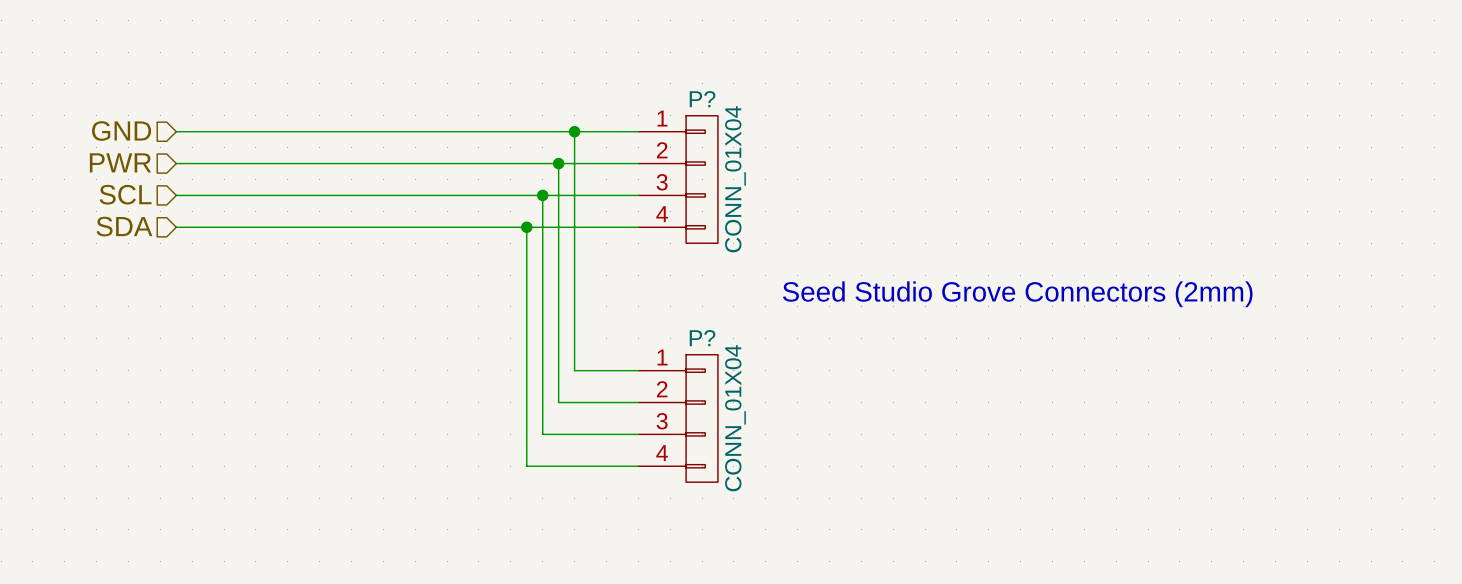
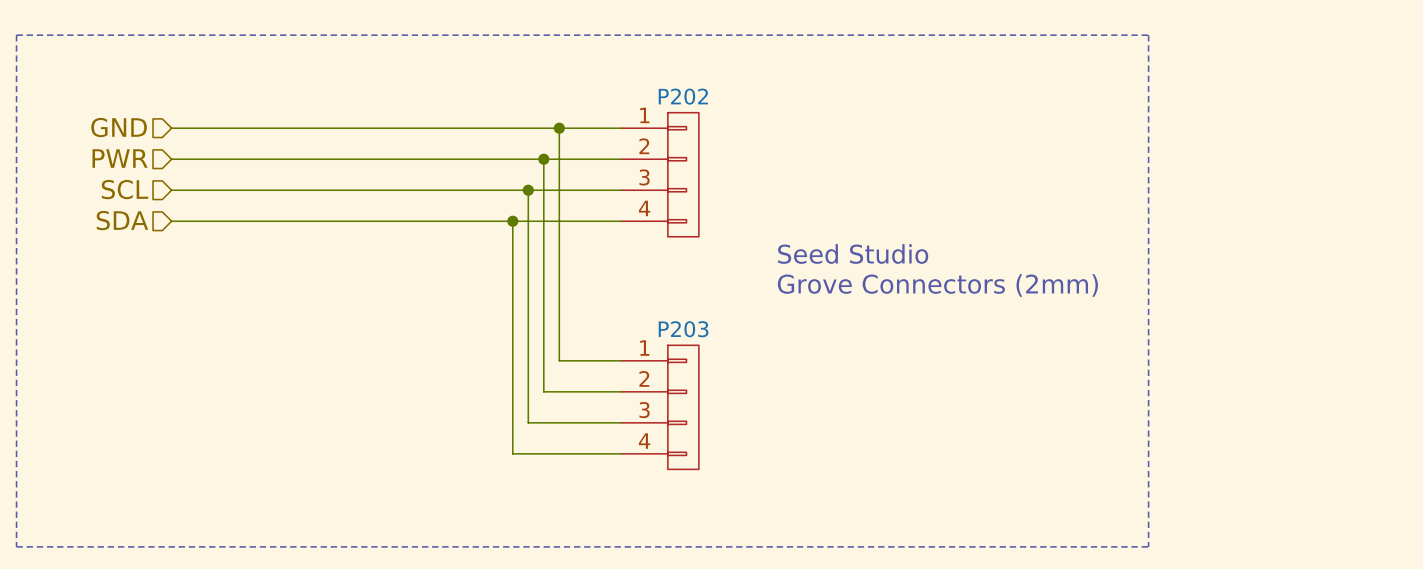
line: none -> (16, 35) (16, 546) (1148, 546) (1148, 35) (16, 35)
P? name: P? (702, 99) -> P202 (683, 96)
P? value: CONN_01X04 (735, 179) -> none
text: none -> Seed Studio (853, 253)
text: Seed Studio Grove Connectors (2mm) (1017, 294) -> Grove Connectors (2mm) (937, 285)
P? name: P? (702, 338) -> P203 (683, 329)
P? value: CONN_01X04 (735, 418) -> none

